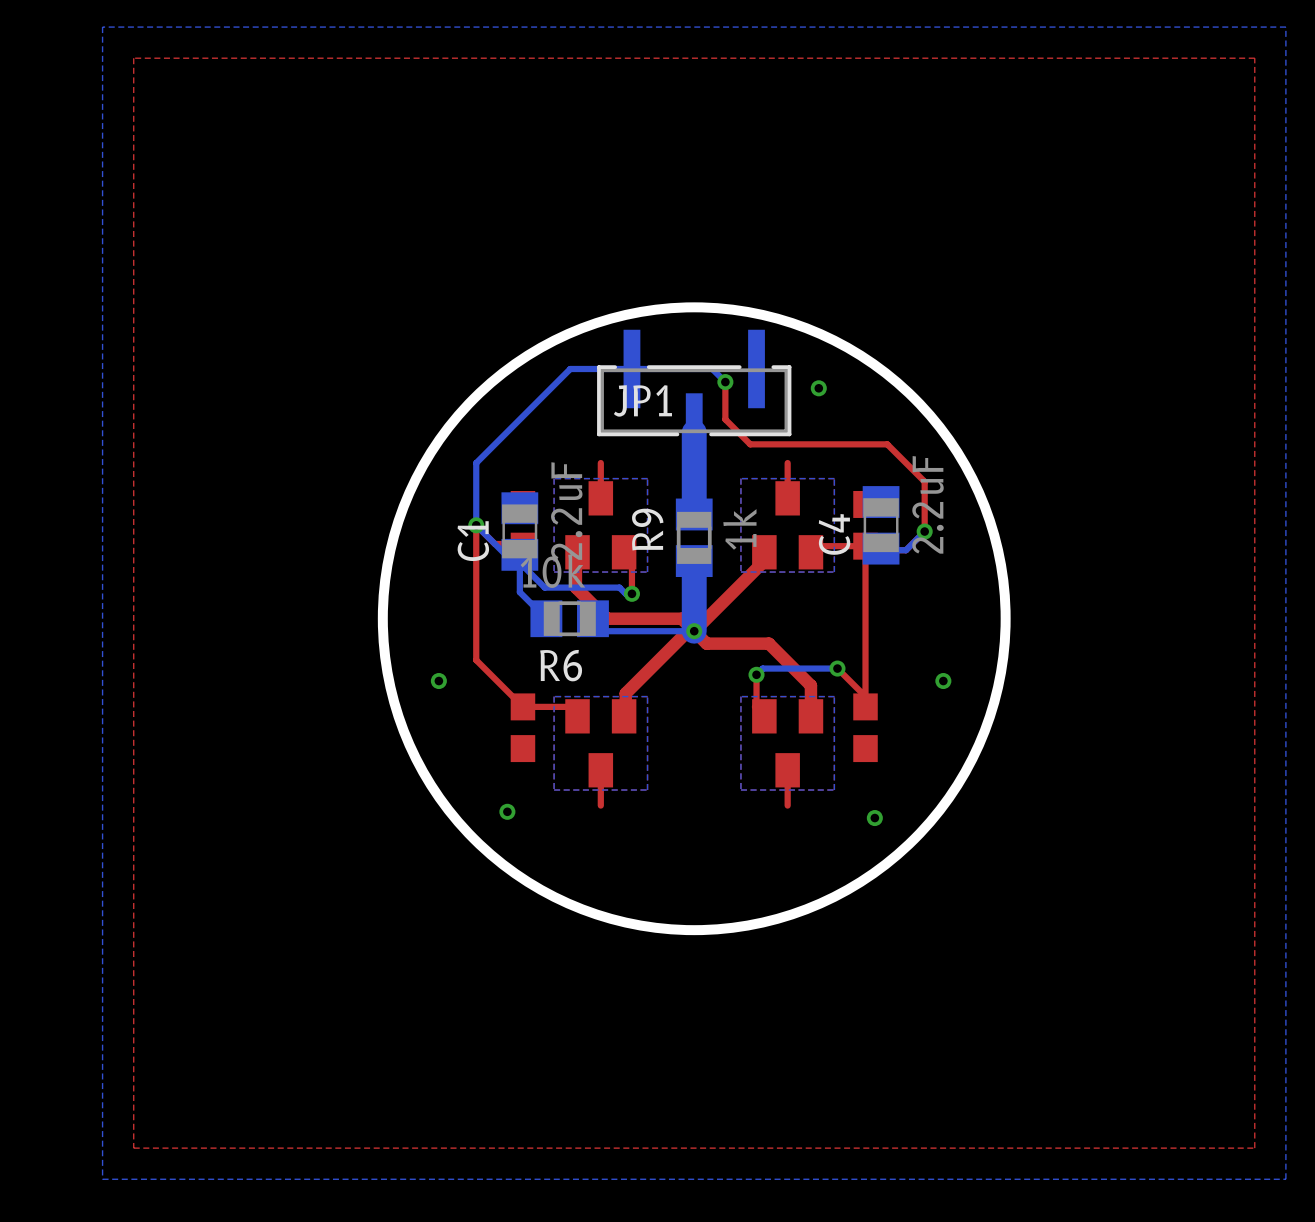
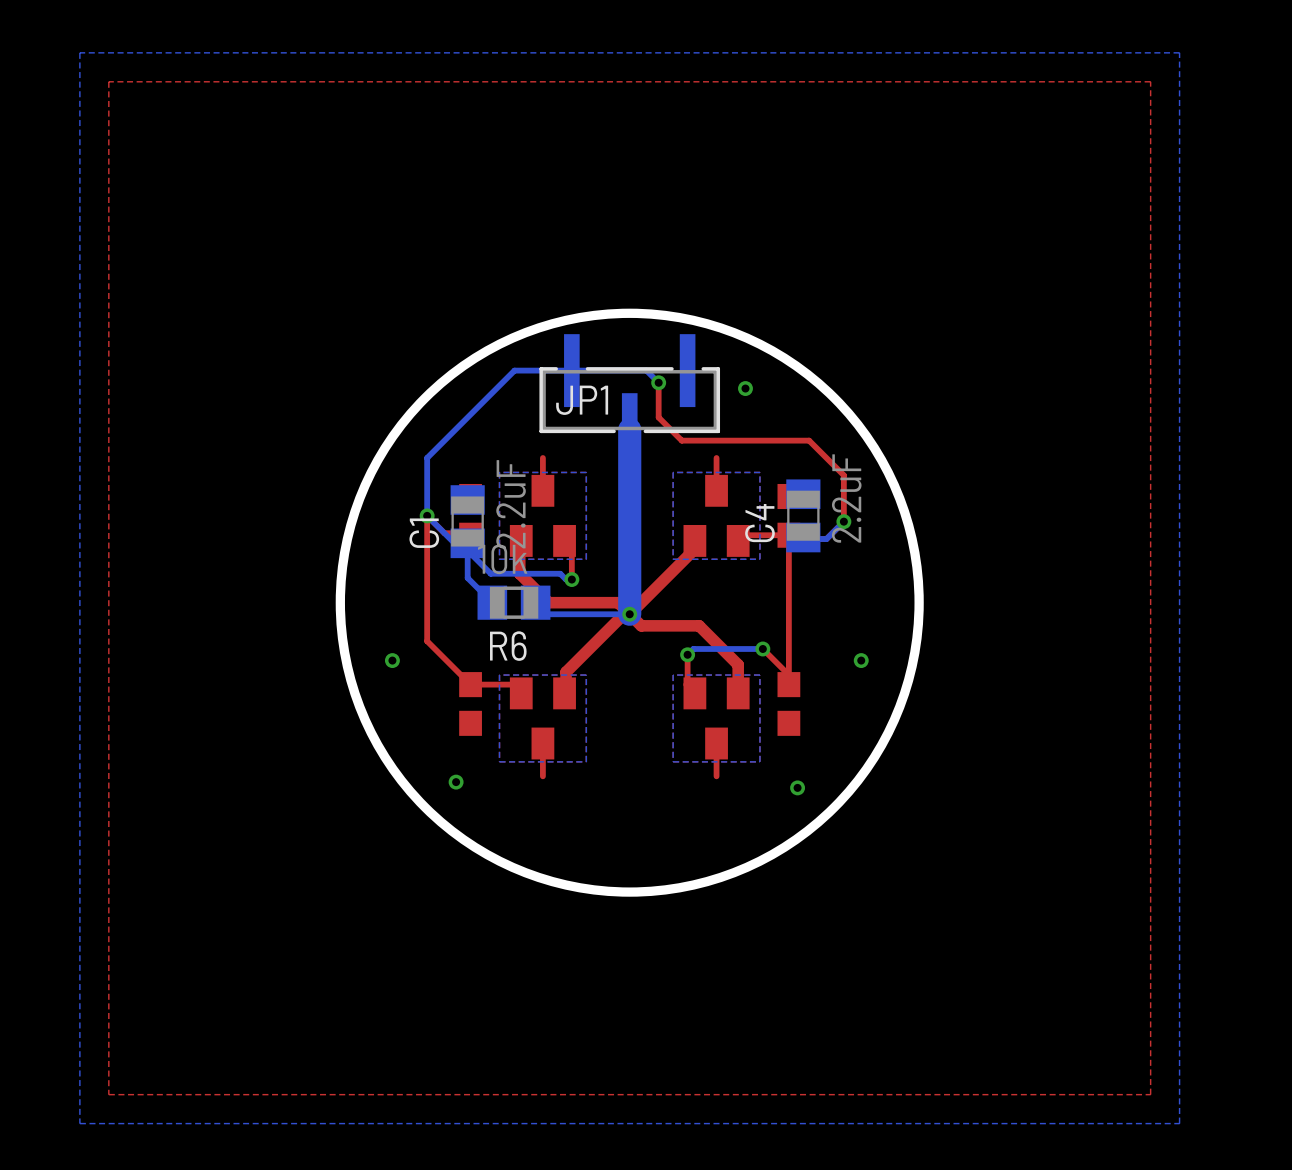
bottom track: none -> (629, 505) (629, 549)
R9: 1k (694, 537) -> none

